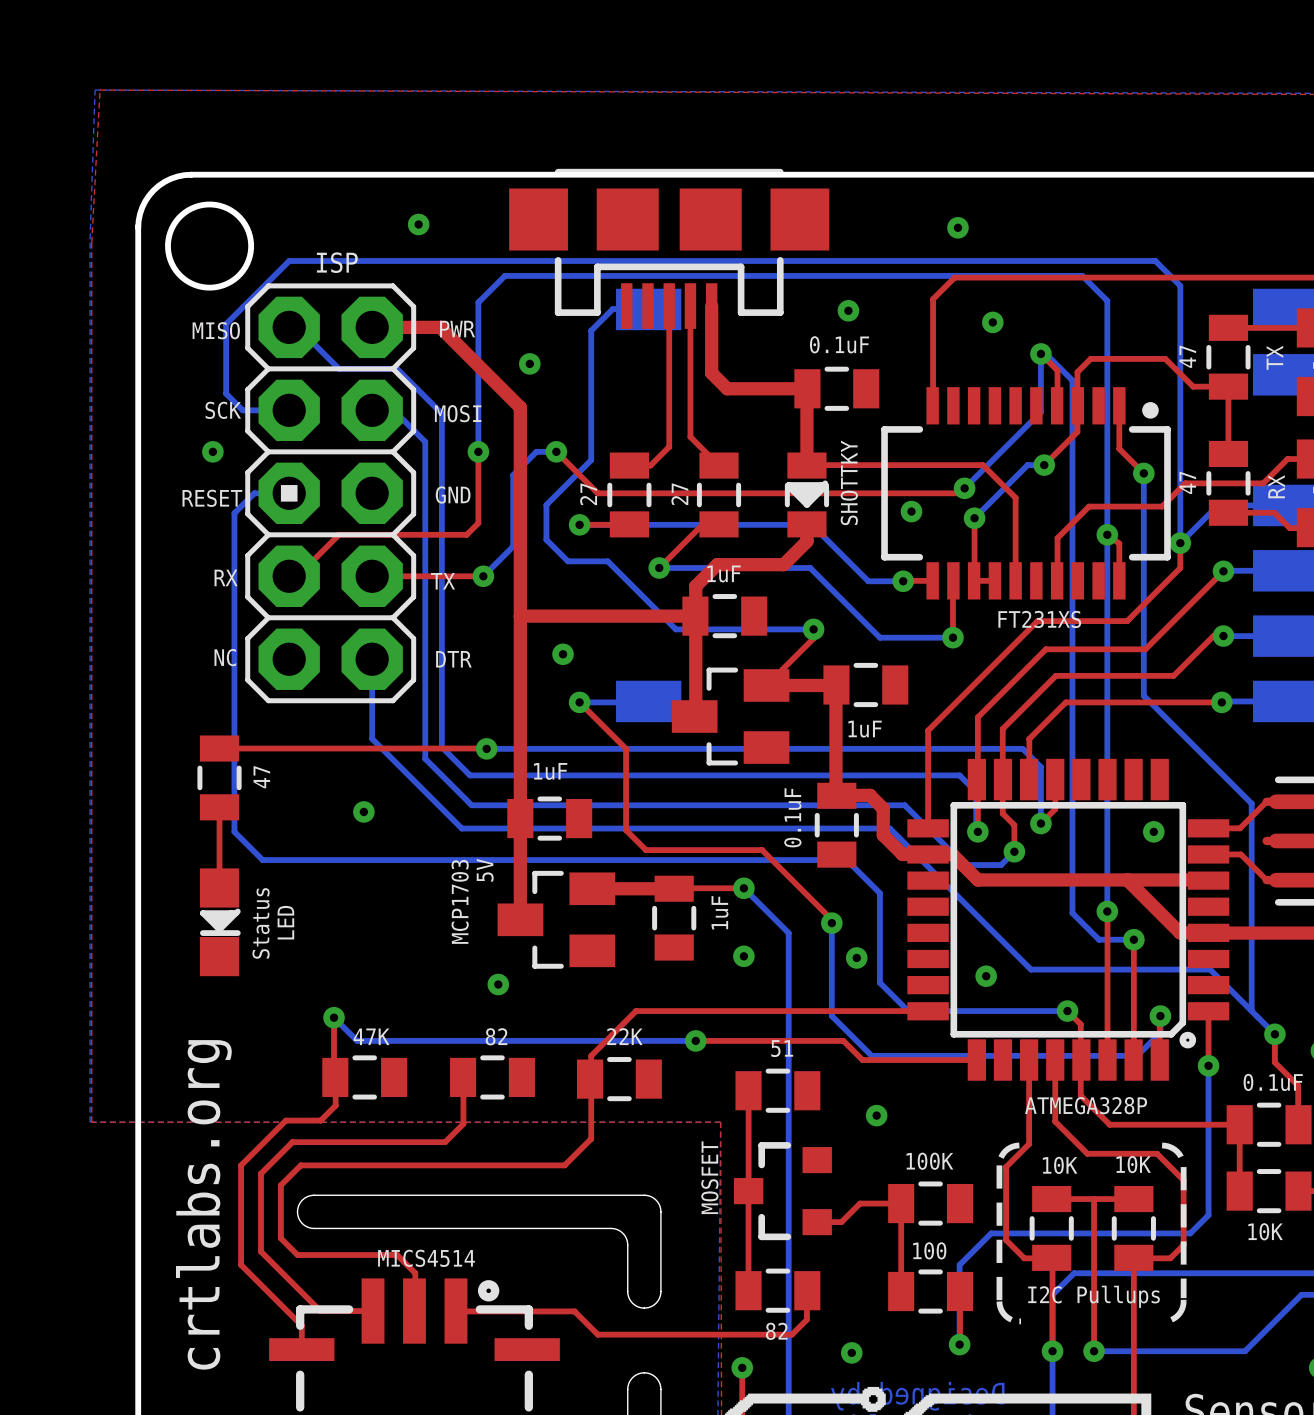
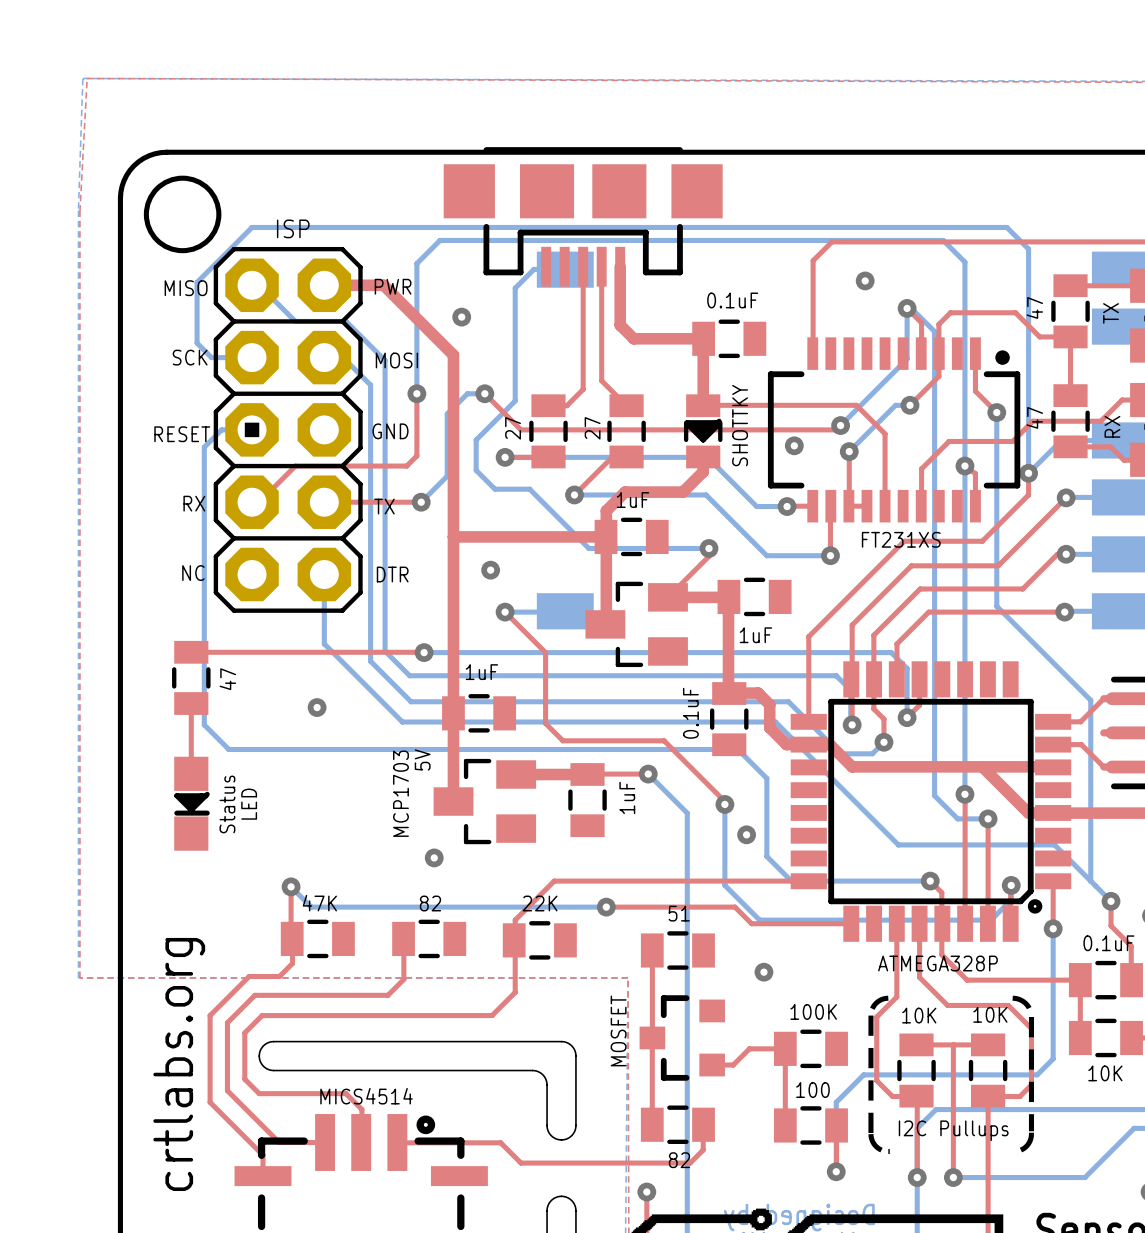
via: (418, 224) -> none
via: (957, 227) -> none
via: (848, 310) -> none
via: (212, 451) -> none
via: (1153, 831) -> none
via: (743, 956) -> none
via: (986, 976) -> none
via: (851, 1352) -> none

